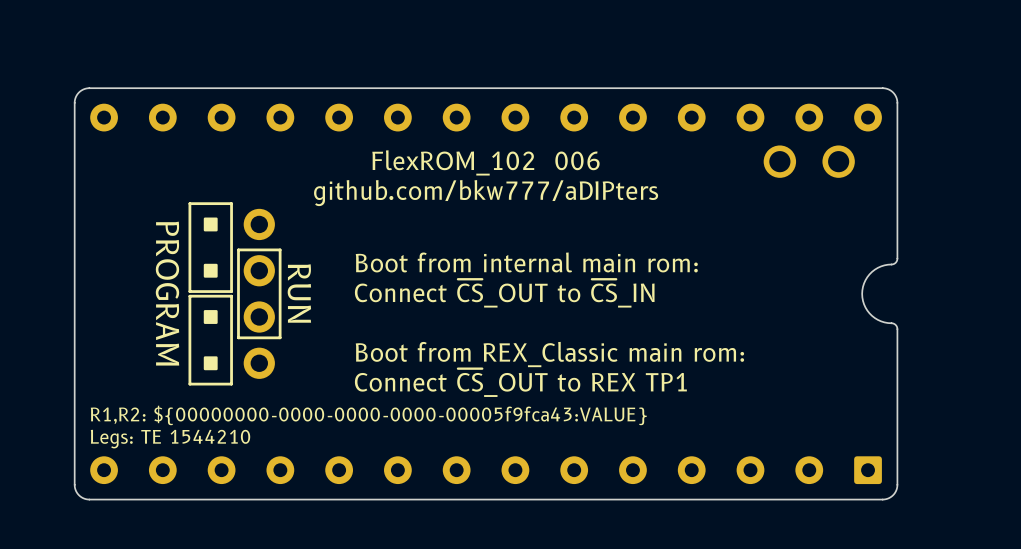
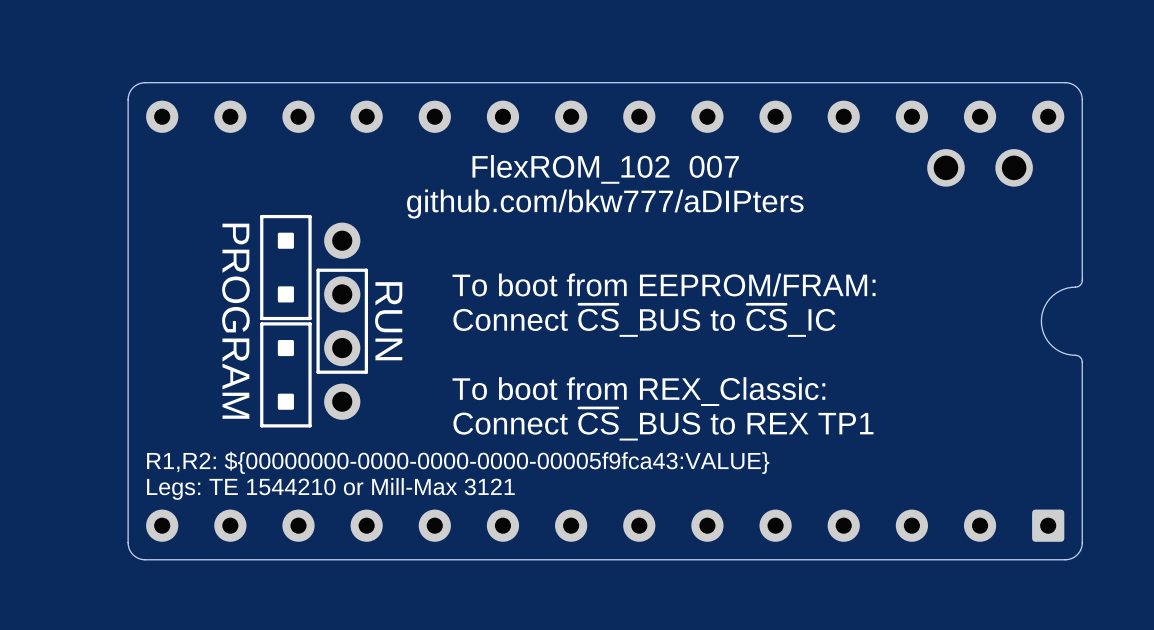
text: FlexROM_102 006 (485, 162) -> FlexROM_102 007 (605, 169)
text: Boot from internal main rom: (526, 262) -> To boot from EEPROM/FRAM: (664, 284)
text: Connect ~{CS}_OUT to ~{CS}_IN (504, 293) -> Connect ~{CS}_BUS to ~{CS}_IC (644, 320)
text: Boot from REX_Classic main rom: (549, 354) -> To boot from REX_Classic: (638, 391)
text: Connect ~{CS}_OUT to REX TP1 (520, 382) -> Connect ~{CS}_BUS to REX TP1 (663, 424)
text: Legs: TE 1544210 (170, 439) -> Legs: TE 1544210 or Mill-Max 3121 (330, 488)

